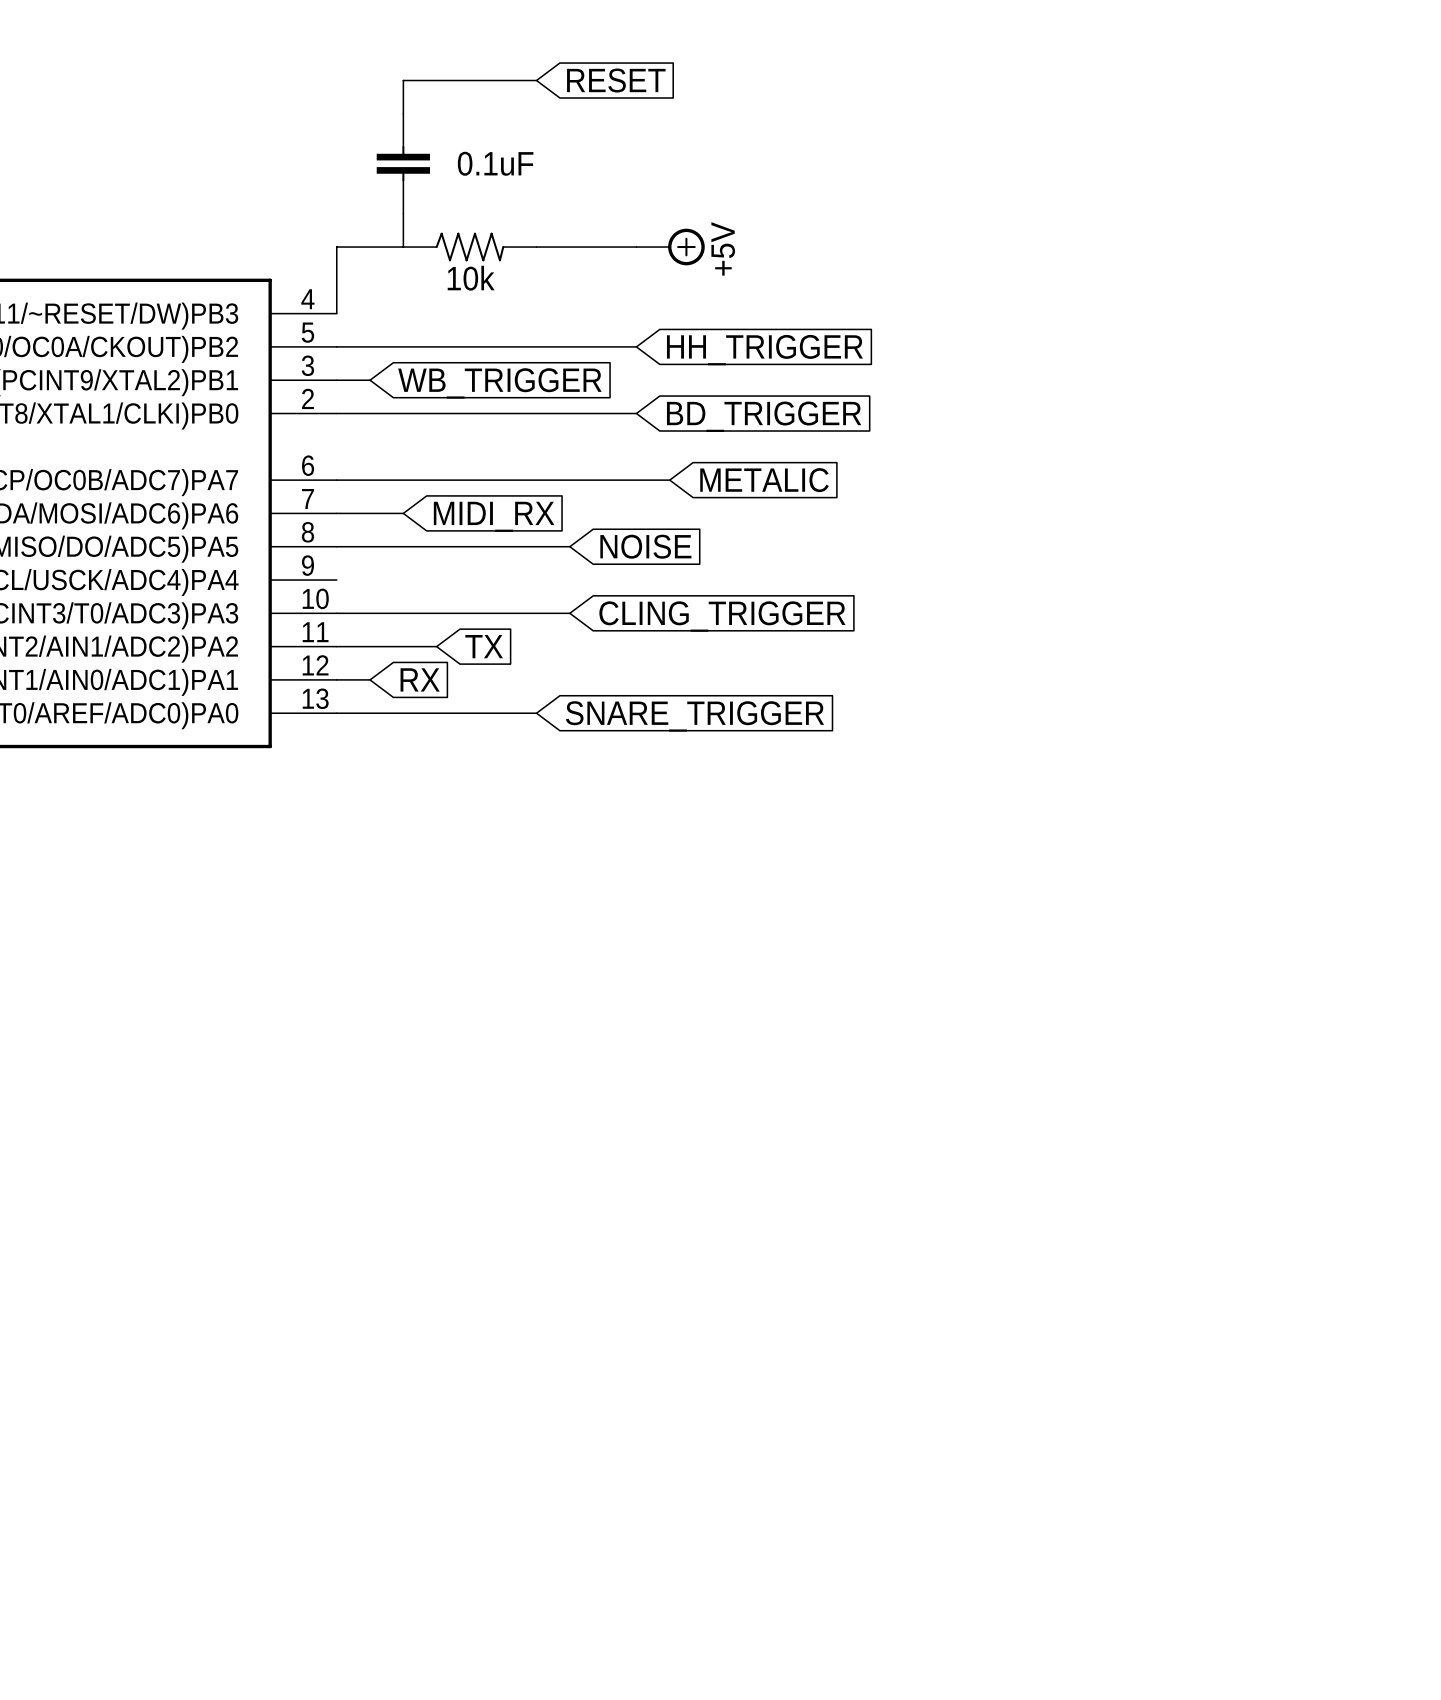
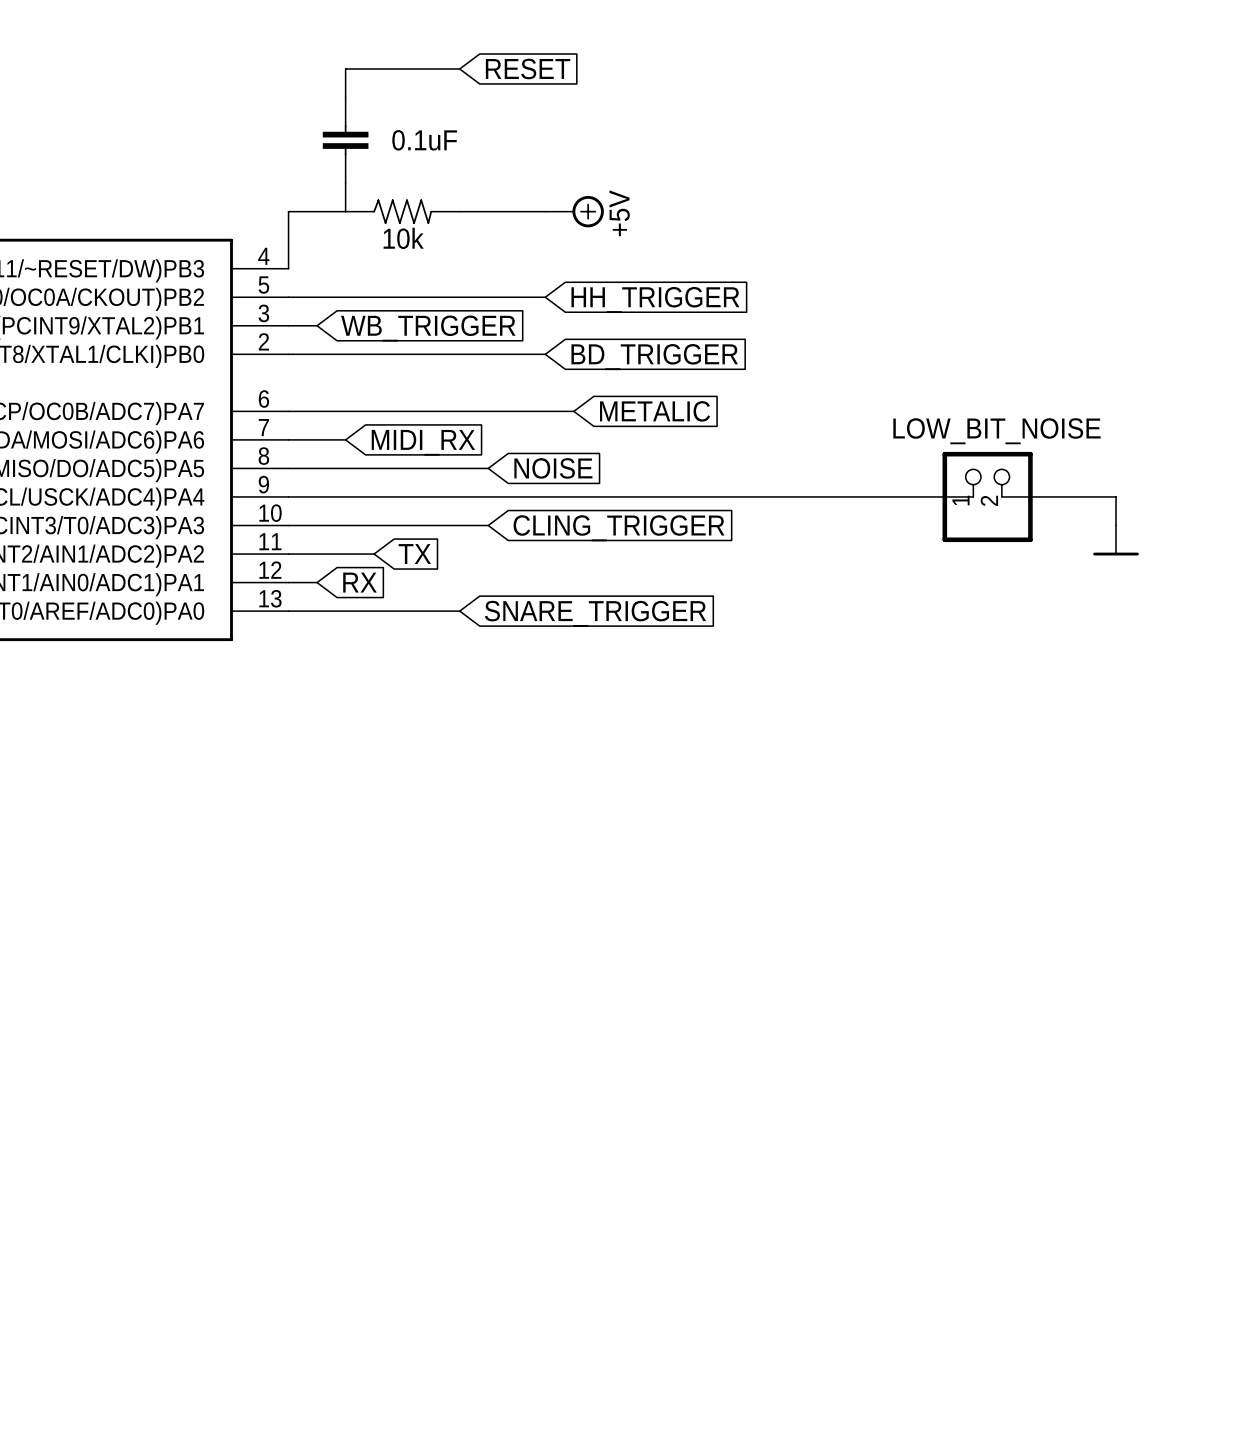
wire: none -> (288, 496) (973, 496)
LOW_BIT_NOISE: none -> (987, 496)
wire: none -> (1001, 496) (1116, 496) (1116, 525)
power symbol: none -> (1116, 540)

